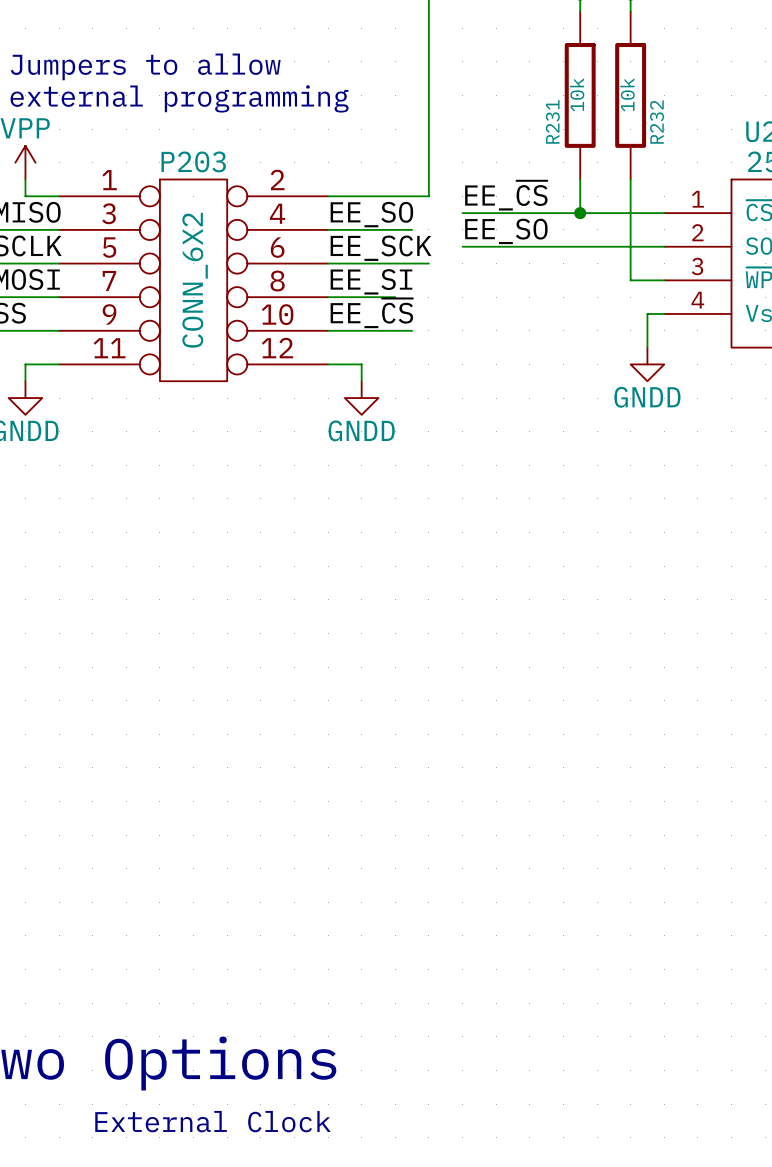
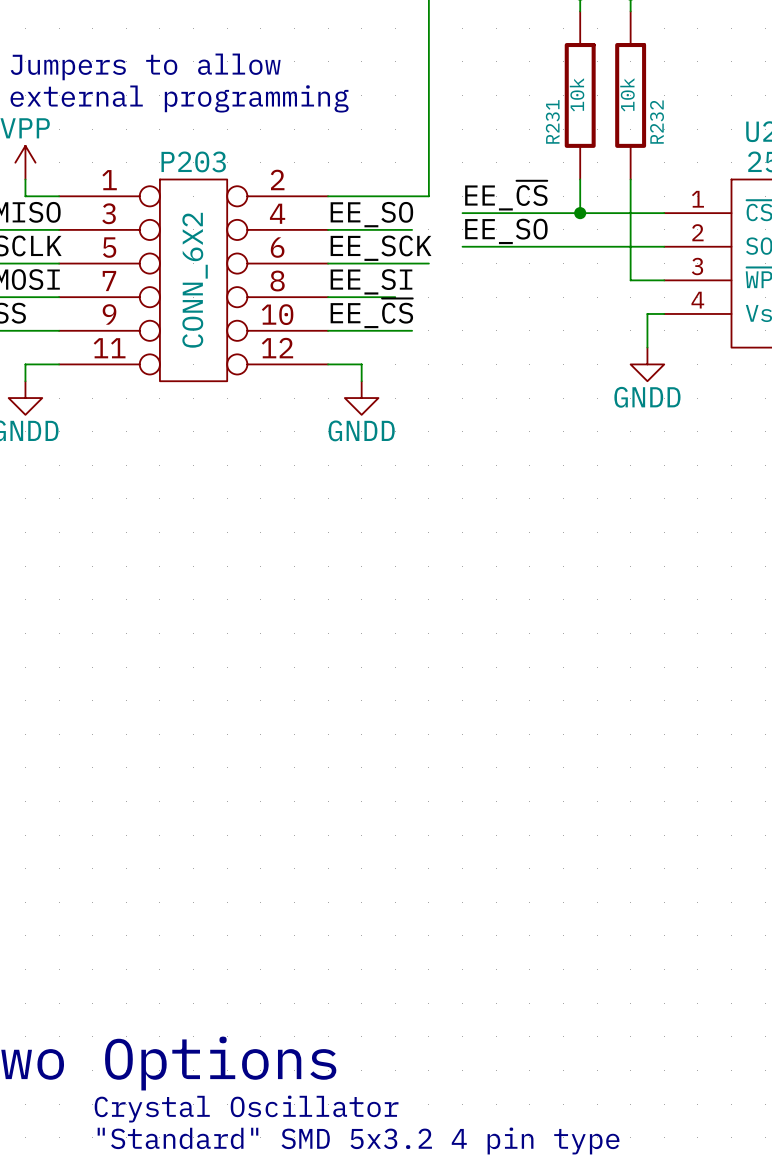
text: none -> Crystal Oscillator (246, 1109)
text: External Clock (212, 1121) -> none
text: none -> "Standard" SMD 5x3.2 4 pin type (358, 1140)

